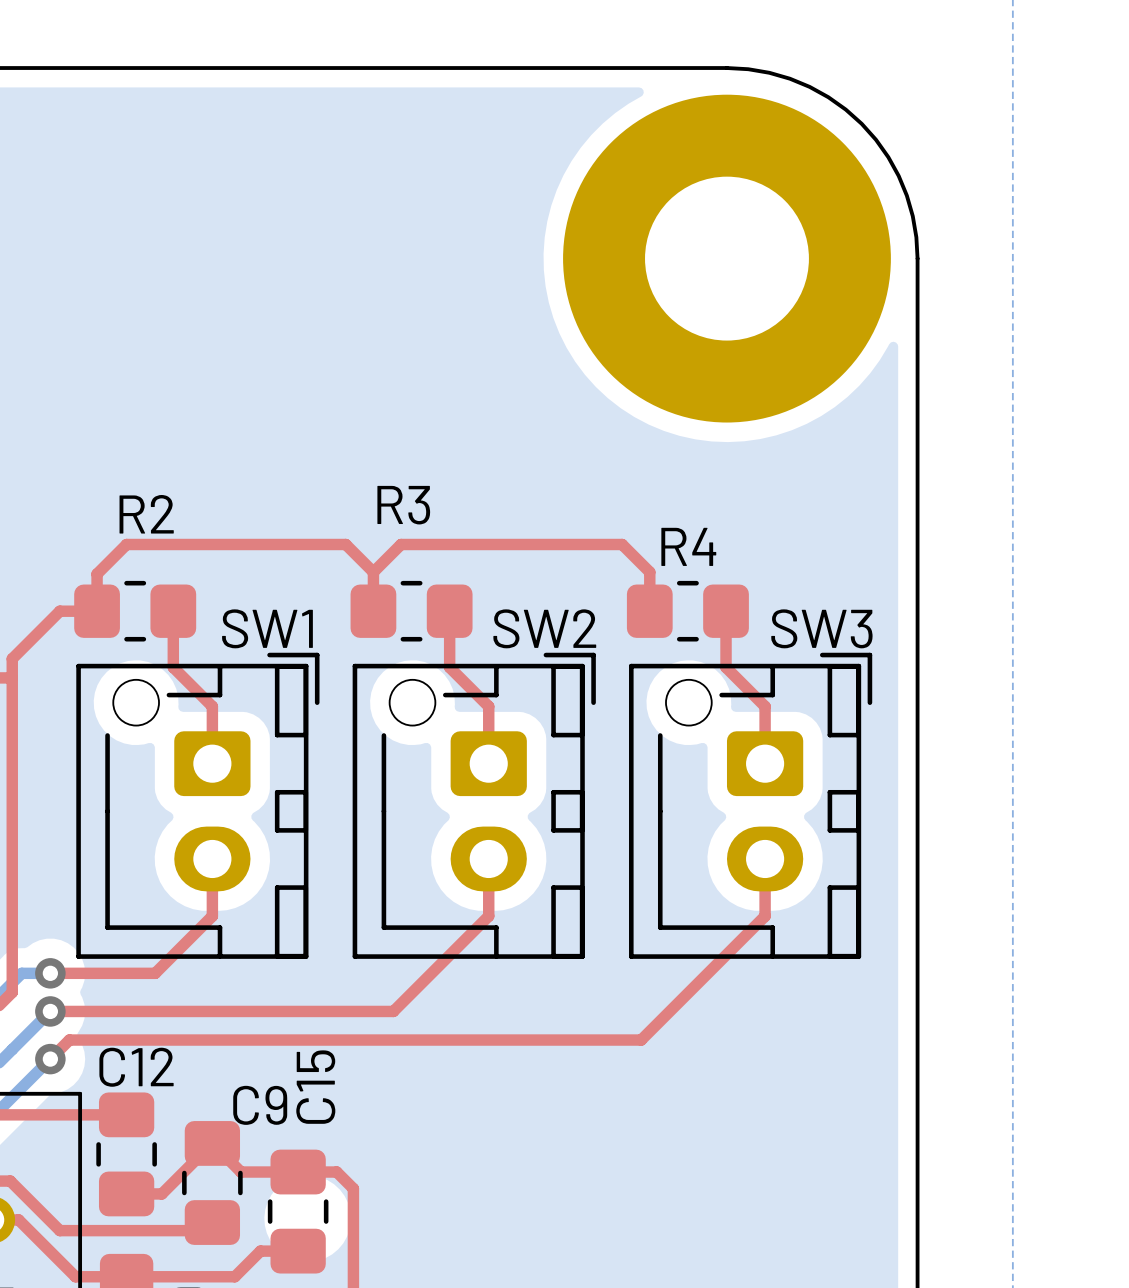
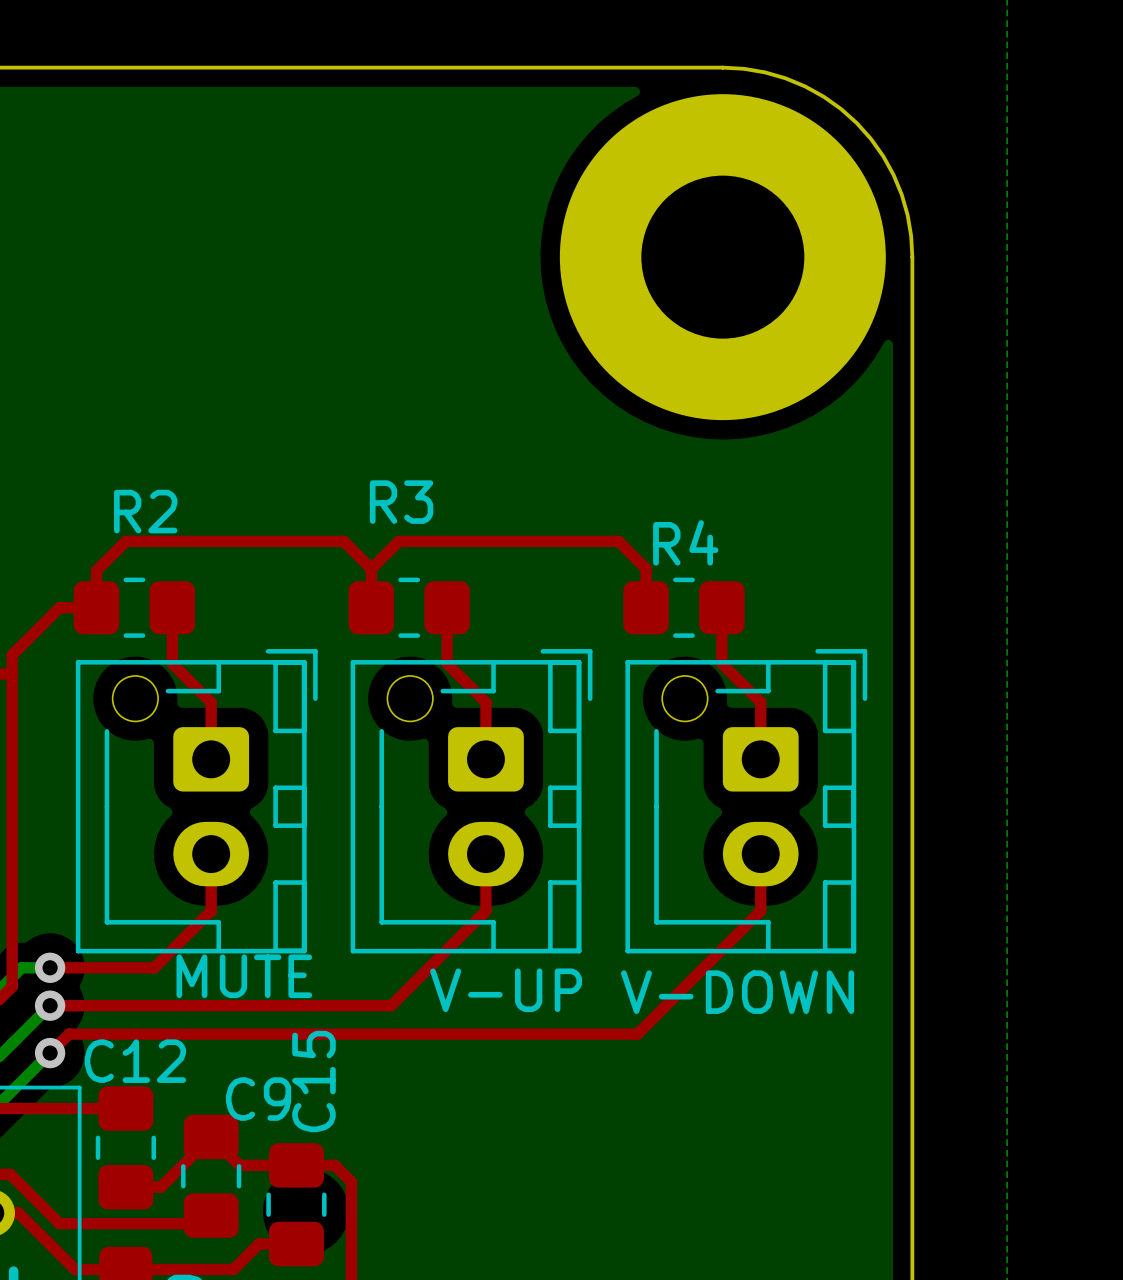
SW1 name: SW1 (267, 628) -> MUTE (244, 976)
SW2 name: SW2 (544, 628) -> V-UP (506, 990)
SW3 name: SW3 (821, 628) -> V-DOWN (737, 992)

